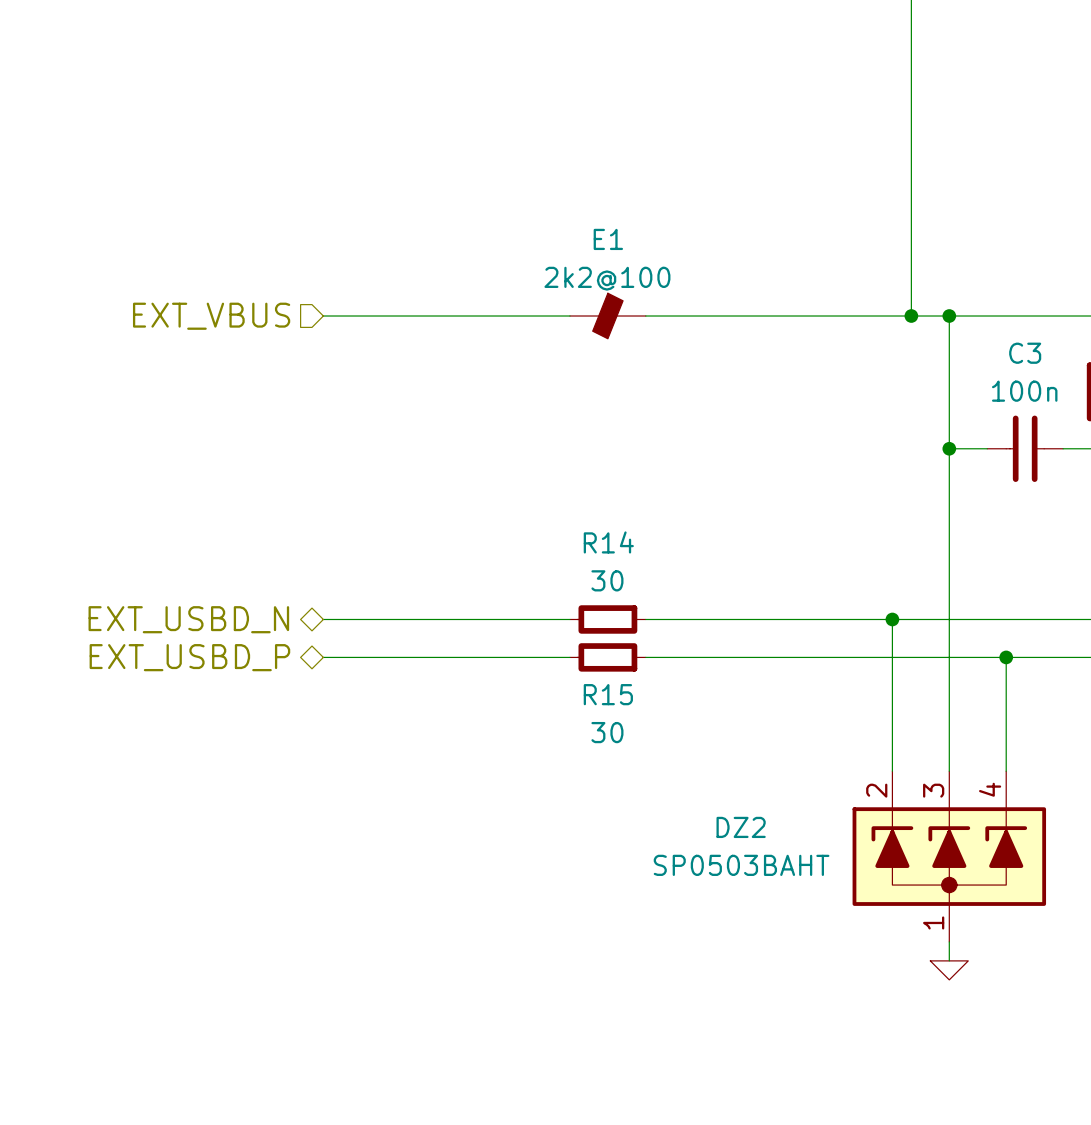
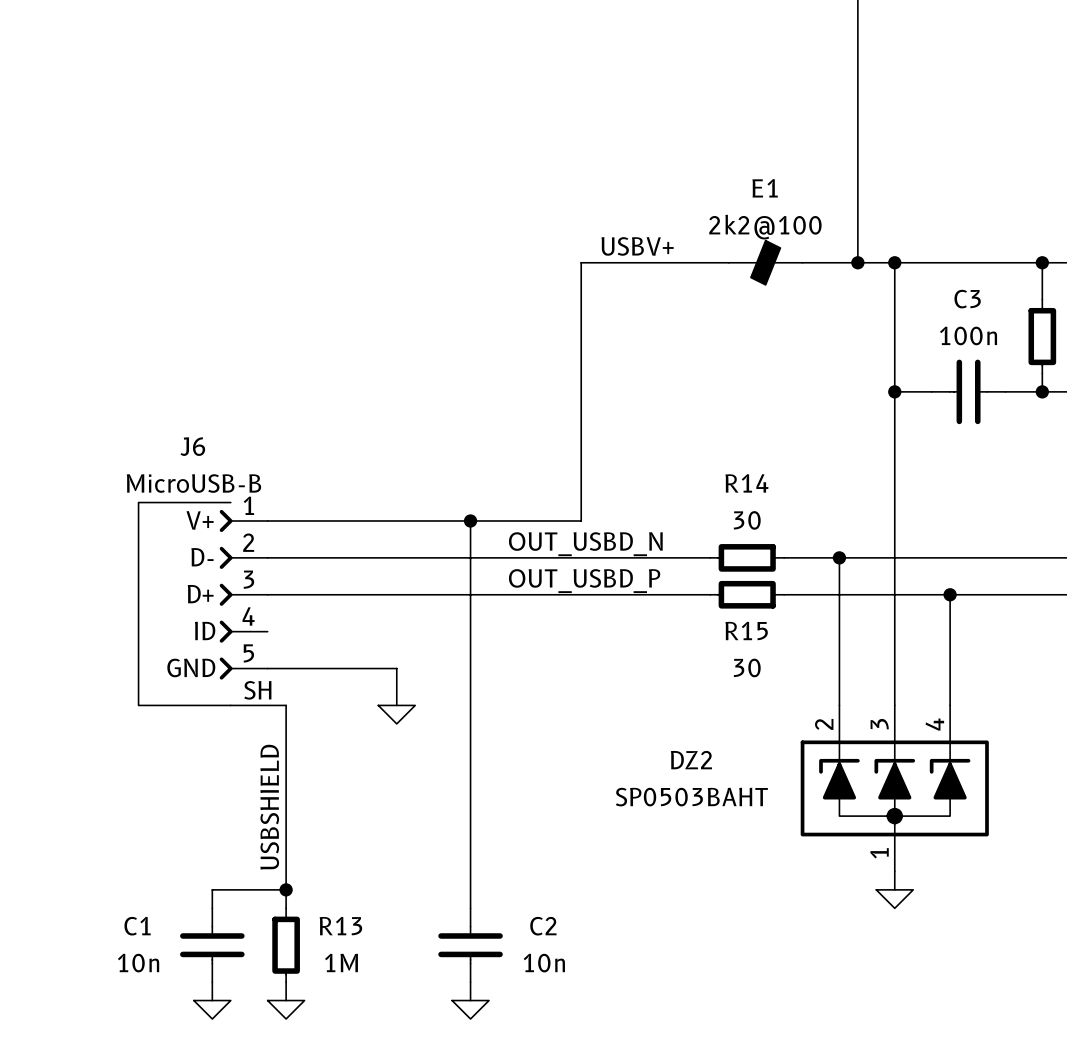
label: none -> USBV+ (637, 246)
hierarchical label: EXT_VBUS (211, 316) -> none
wire: (323, 316) (569, 316) -> none
E1 position: (607, 316) -> (765, 262)
wire: none -> (599, 262) (581, 262) (581, 520) (267, 520)
wire: none -> (470, 520) (470, 908)
junction: none -> (470, 520)
label: none -> OUT_USBD_N (585, 544)
hierarchical label: EXT_USBD_N (188, 619) -> none
wire: none -> (267, 557) (286, 557)
R14 position: (607, 619) -> (747, 557)
wire: (759, 619) (835, 619) -> (525, 557) (599, 557)
label: none -> OUT_USBD_P (584, 581)
hierarchical label: EXT_USBD_P (189, 657) -> none
wire: none -> (267, 594) (286, 594)
R15 position: (607, 657) -> (747, 594)
wire: (759, 657) (835, 657) -> (525, 594) (599, 594)
J6: none -> MicroUSB-B (212, 603)
wire: none -> (267, 668) (396, 668) (396, 705)
wire: none -> (286, 705) (286, 908)
power symbol: none -> (396, 714)
label: none -> USBSHIELD (269, 807)
wire: none -> (286, 889) (212, 889) (212, 908)
junction: none -> (286, 889)
C1: none -> 10n (212, 945)
R13: none -> 1M (286, 945)
C2: none -> 10n (470, 945)
wire: none -> (212, 982) (212, 1000)
wire: none -> (286, 982) (286, 1000)
wire: none -> (470, 982) (470, 1000)
power symbol: none -> (212, 1009)
power symbol: none -> (286, 1009)
power symbol: none -> (470, 1009)

